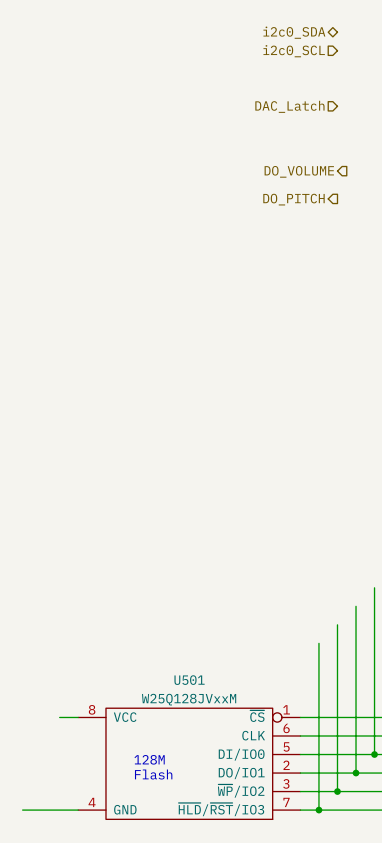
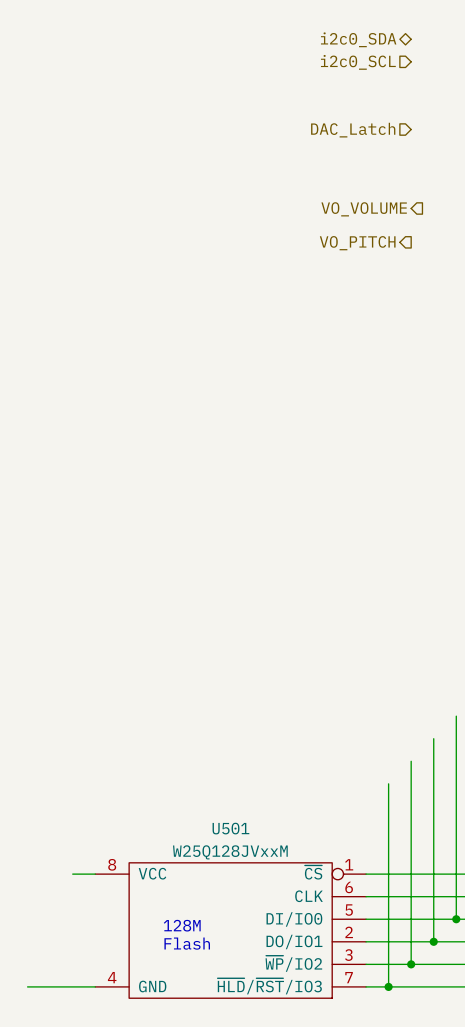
hierarchical label: DO_VOLUME (299, 171) -> VO_VOLUME (364, 209)
hierarchical label: DO_PITCH (293, 199) -> VO_PITCH (357, 243)

